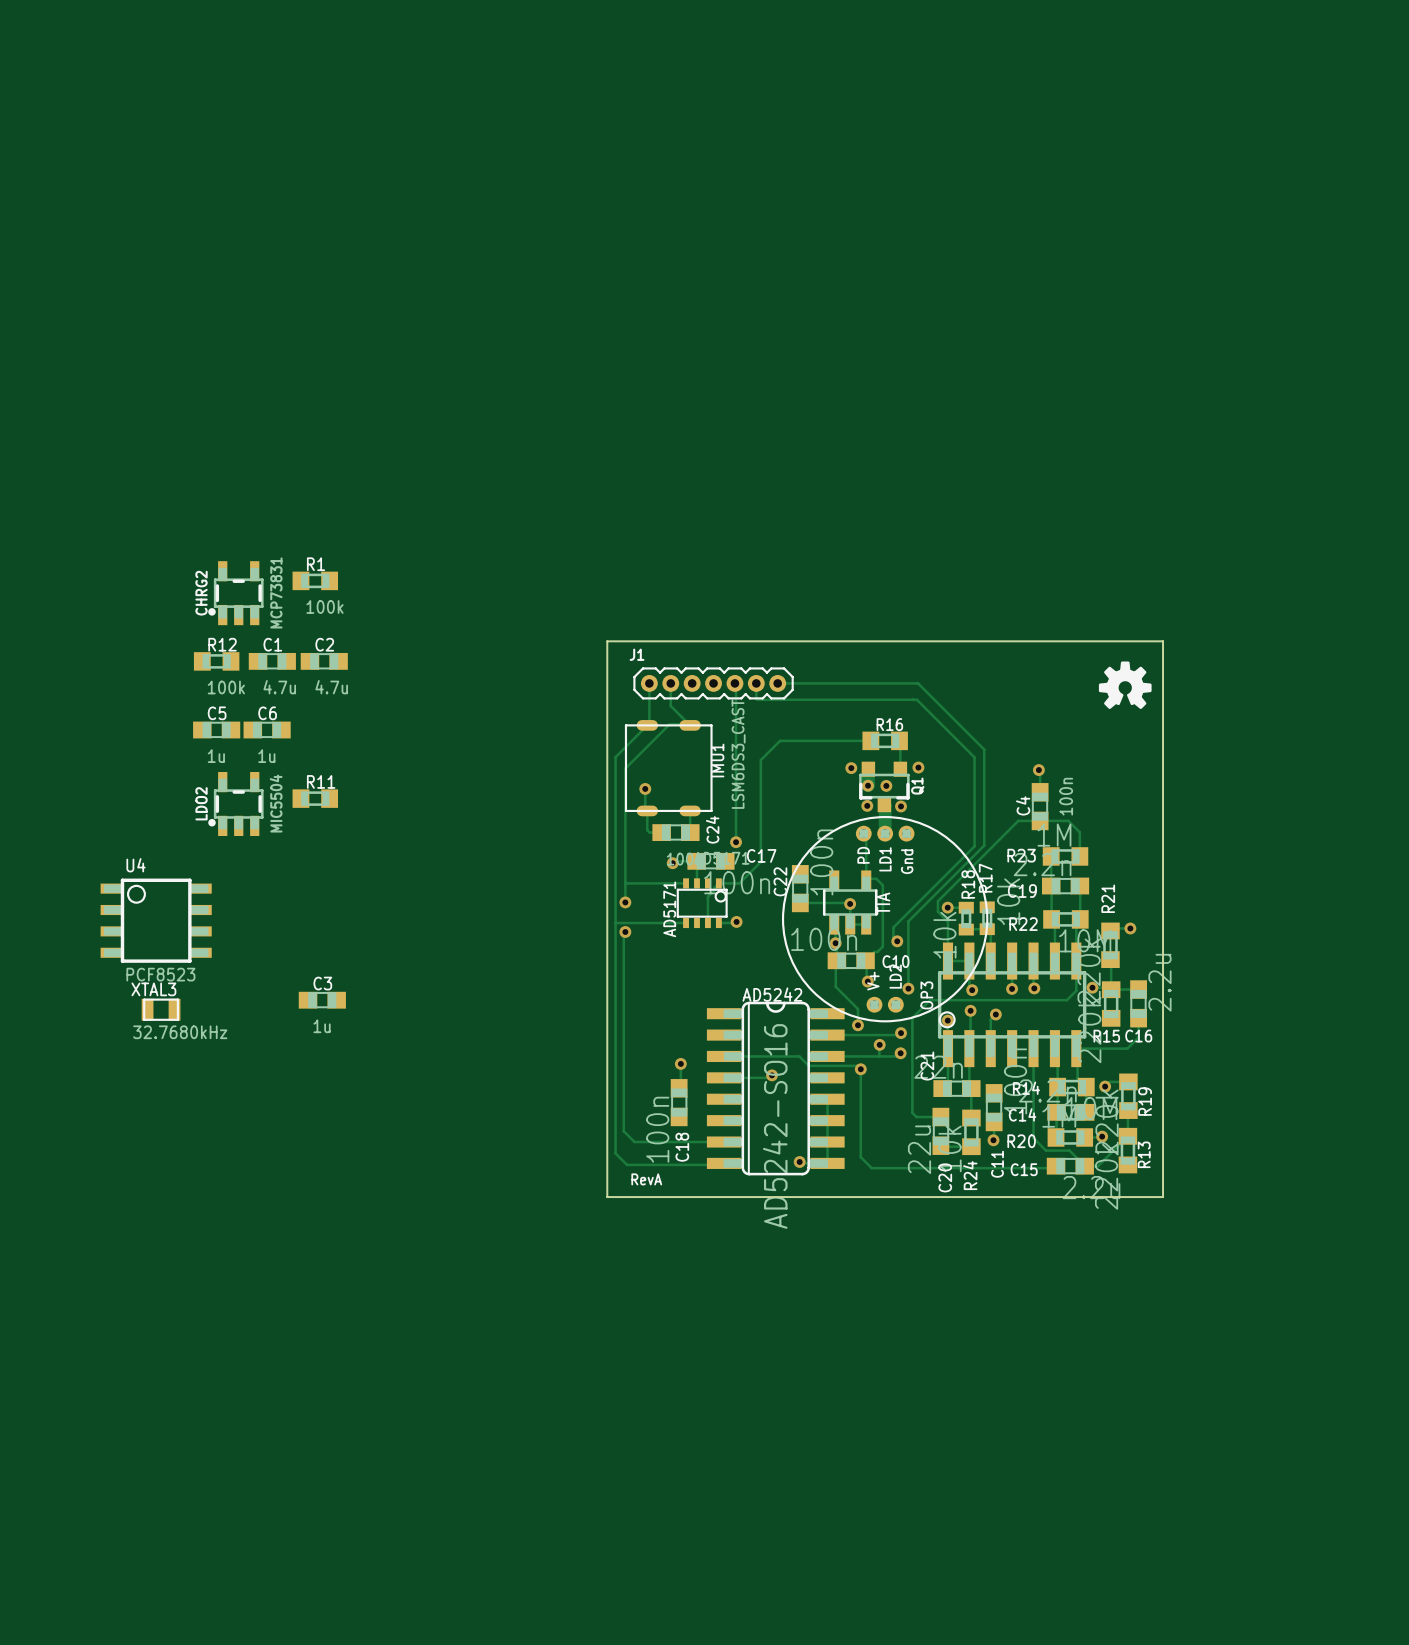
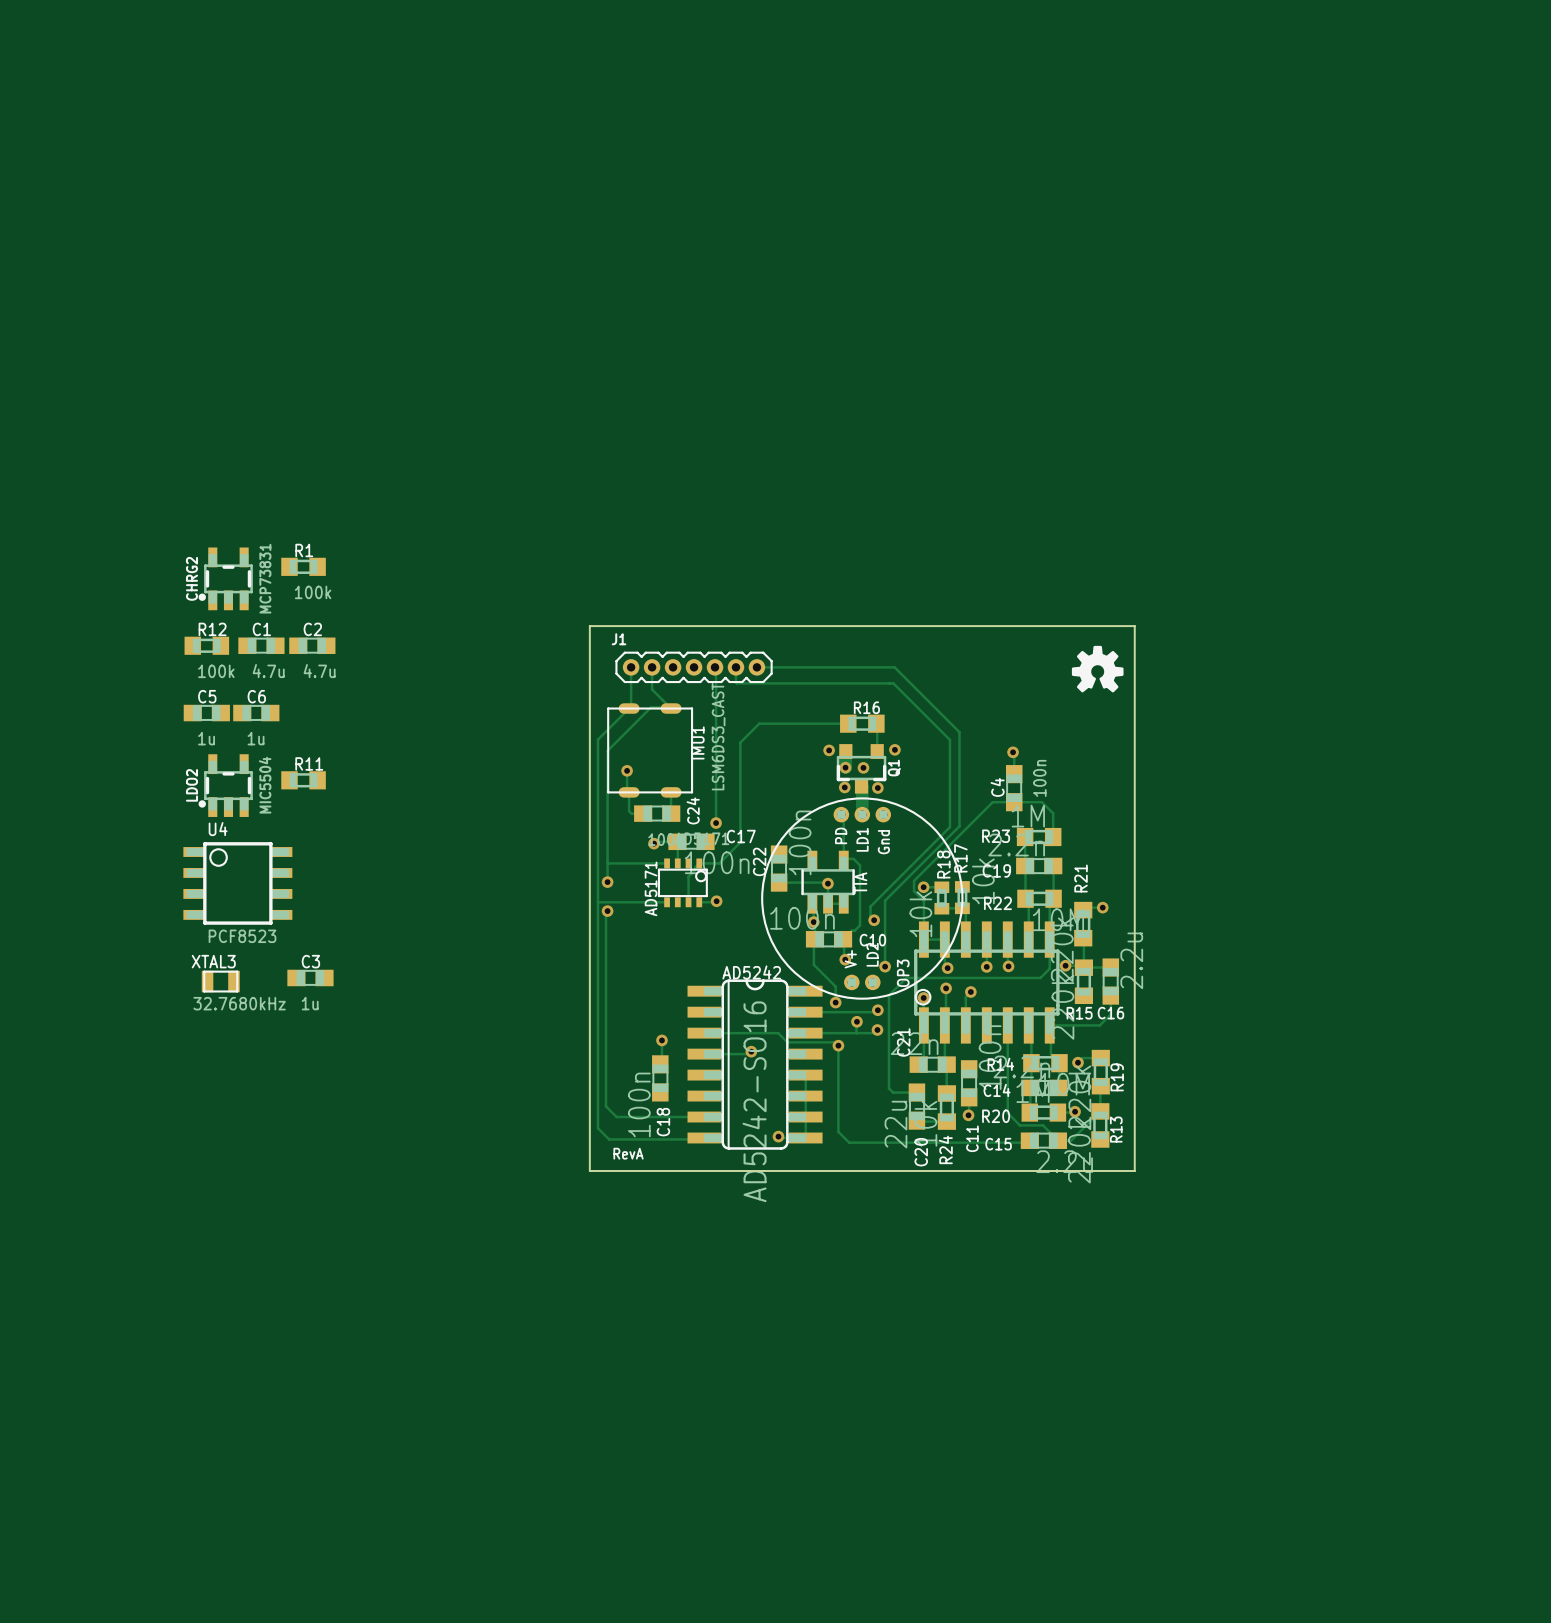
U4 position: (156, 920) -> (237, 883)
XTAL3 position: (161, 1009) -> (220, 981)

